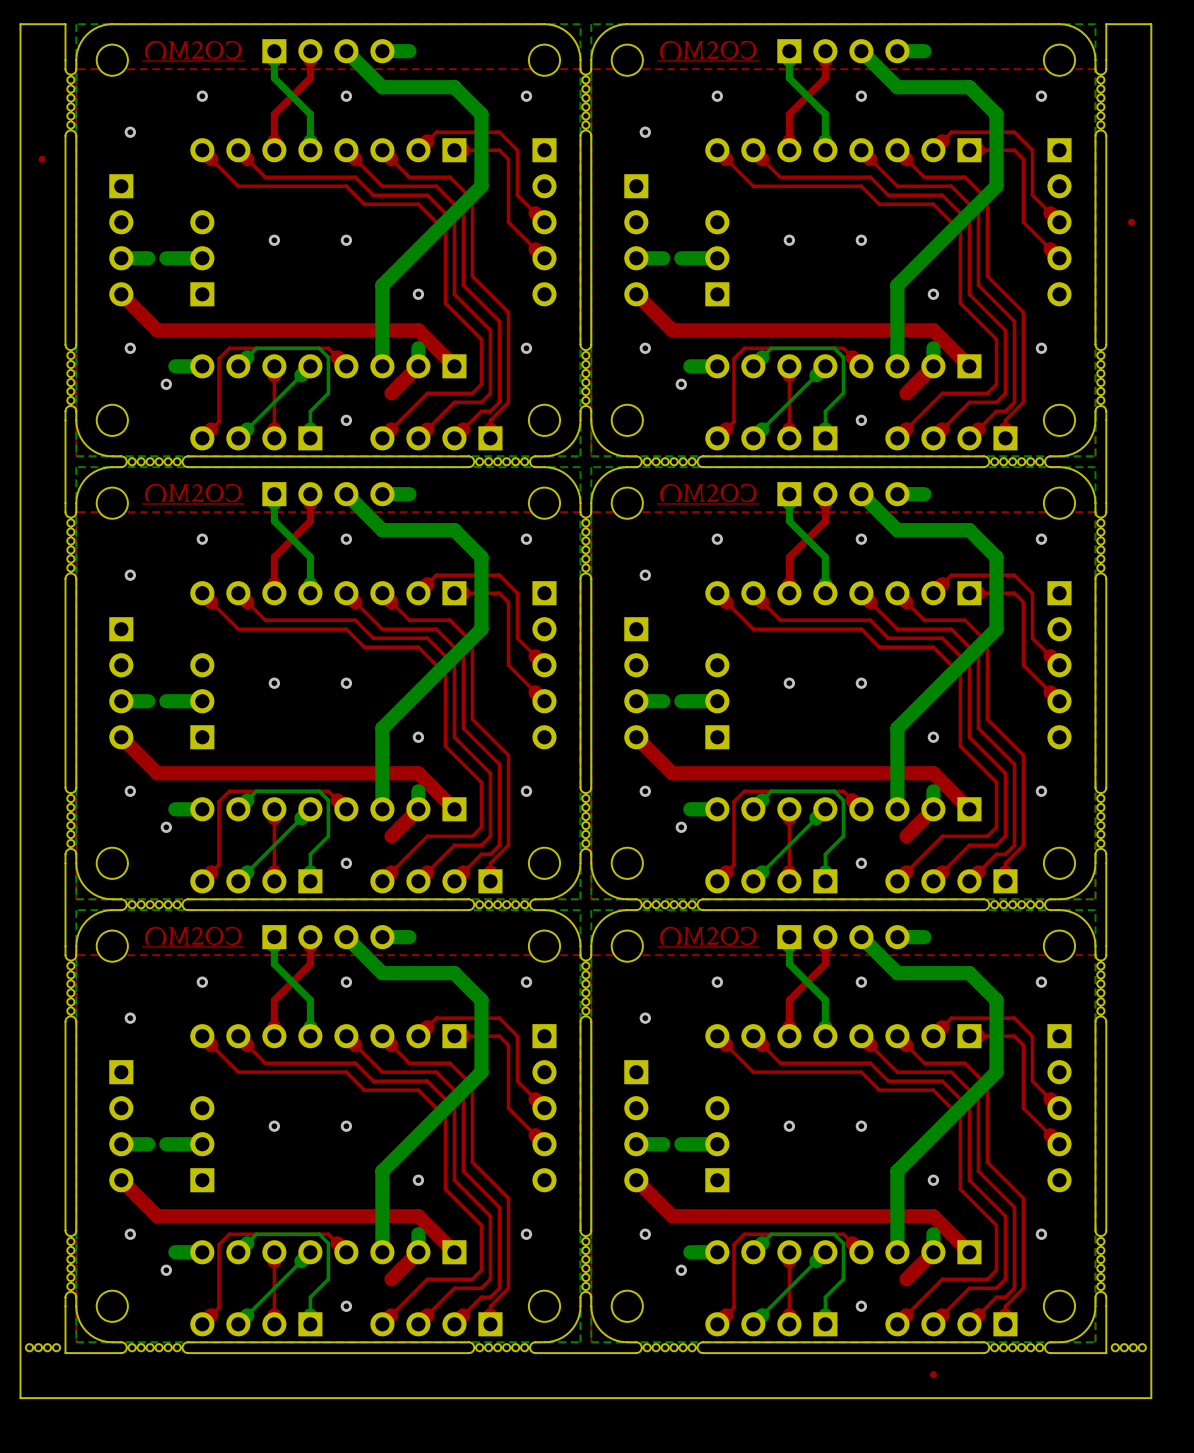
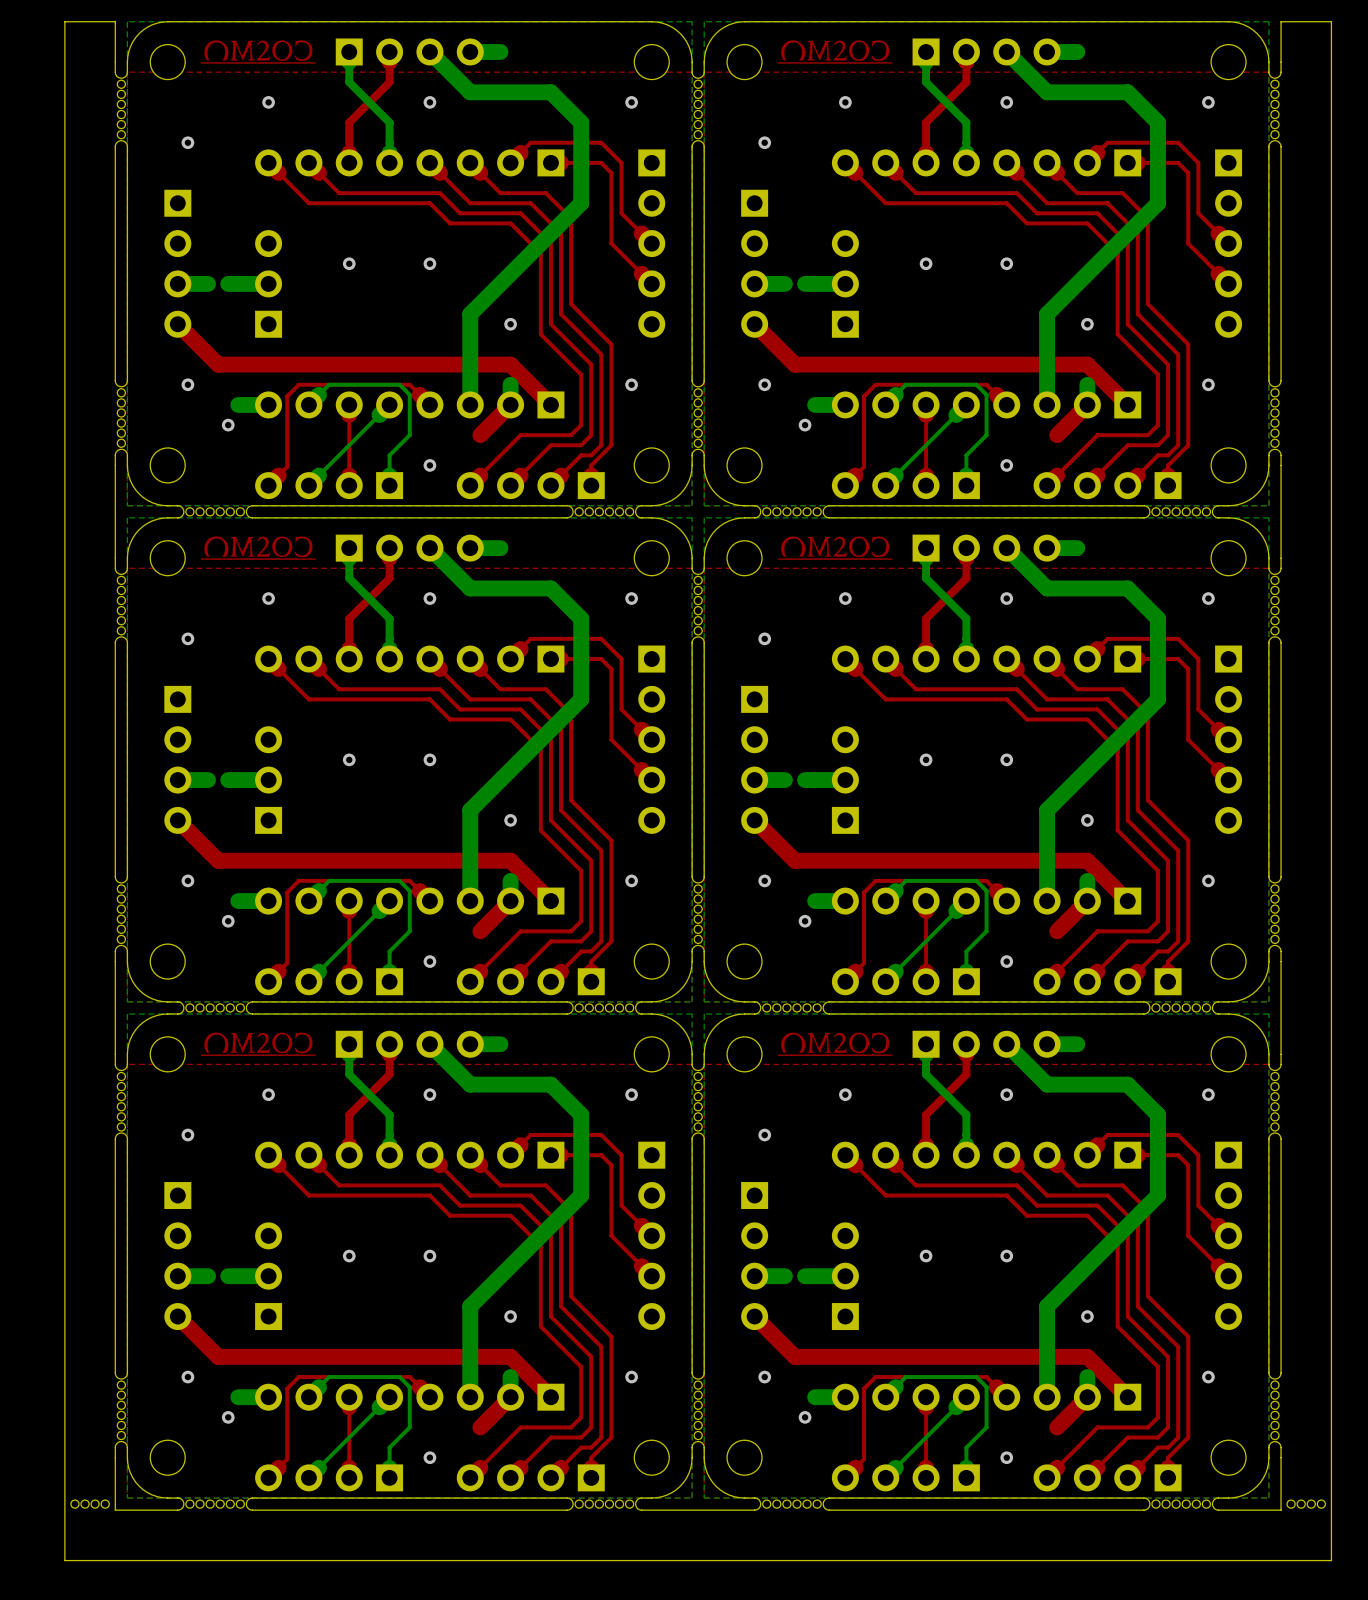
part: (42, 159) -> none
part: (1131, 222) -> none
part: (933, 1374) -> none

